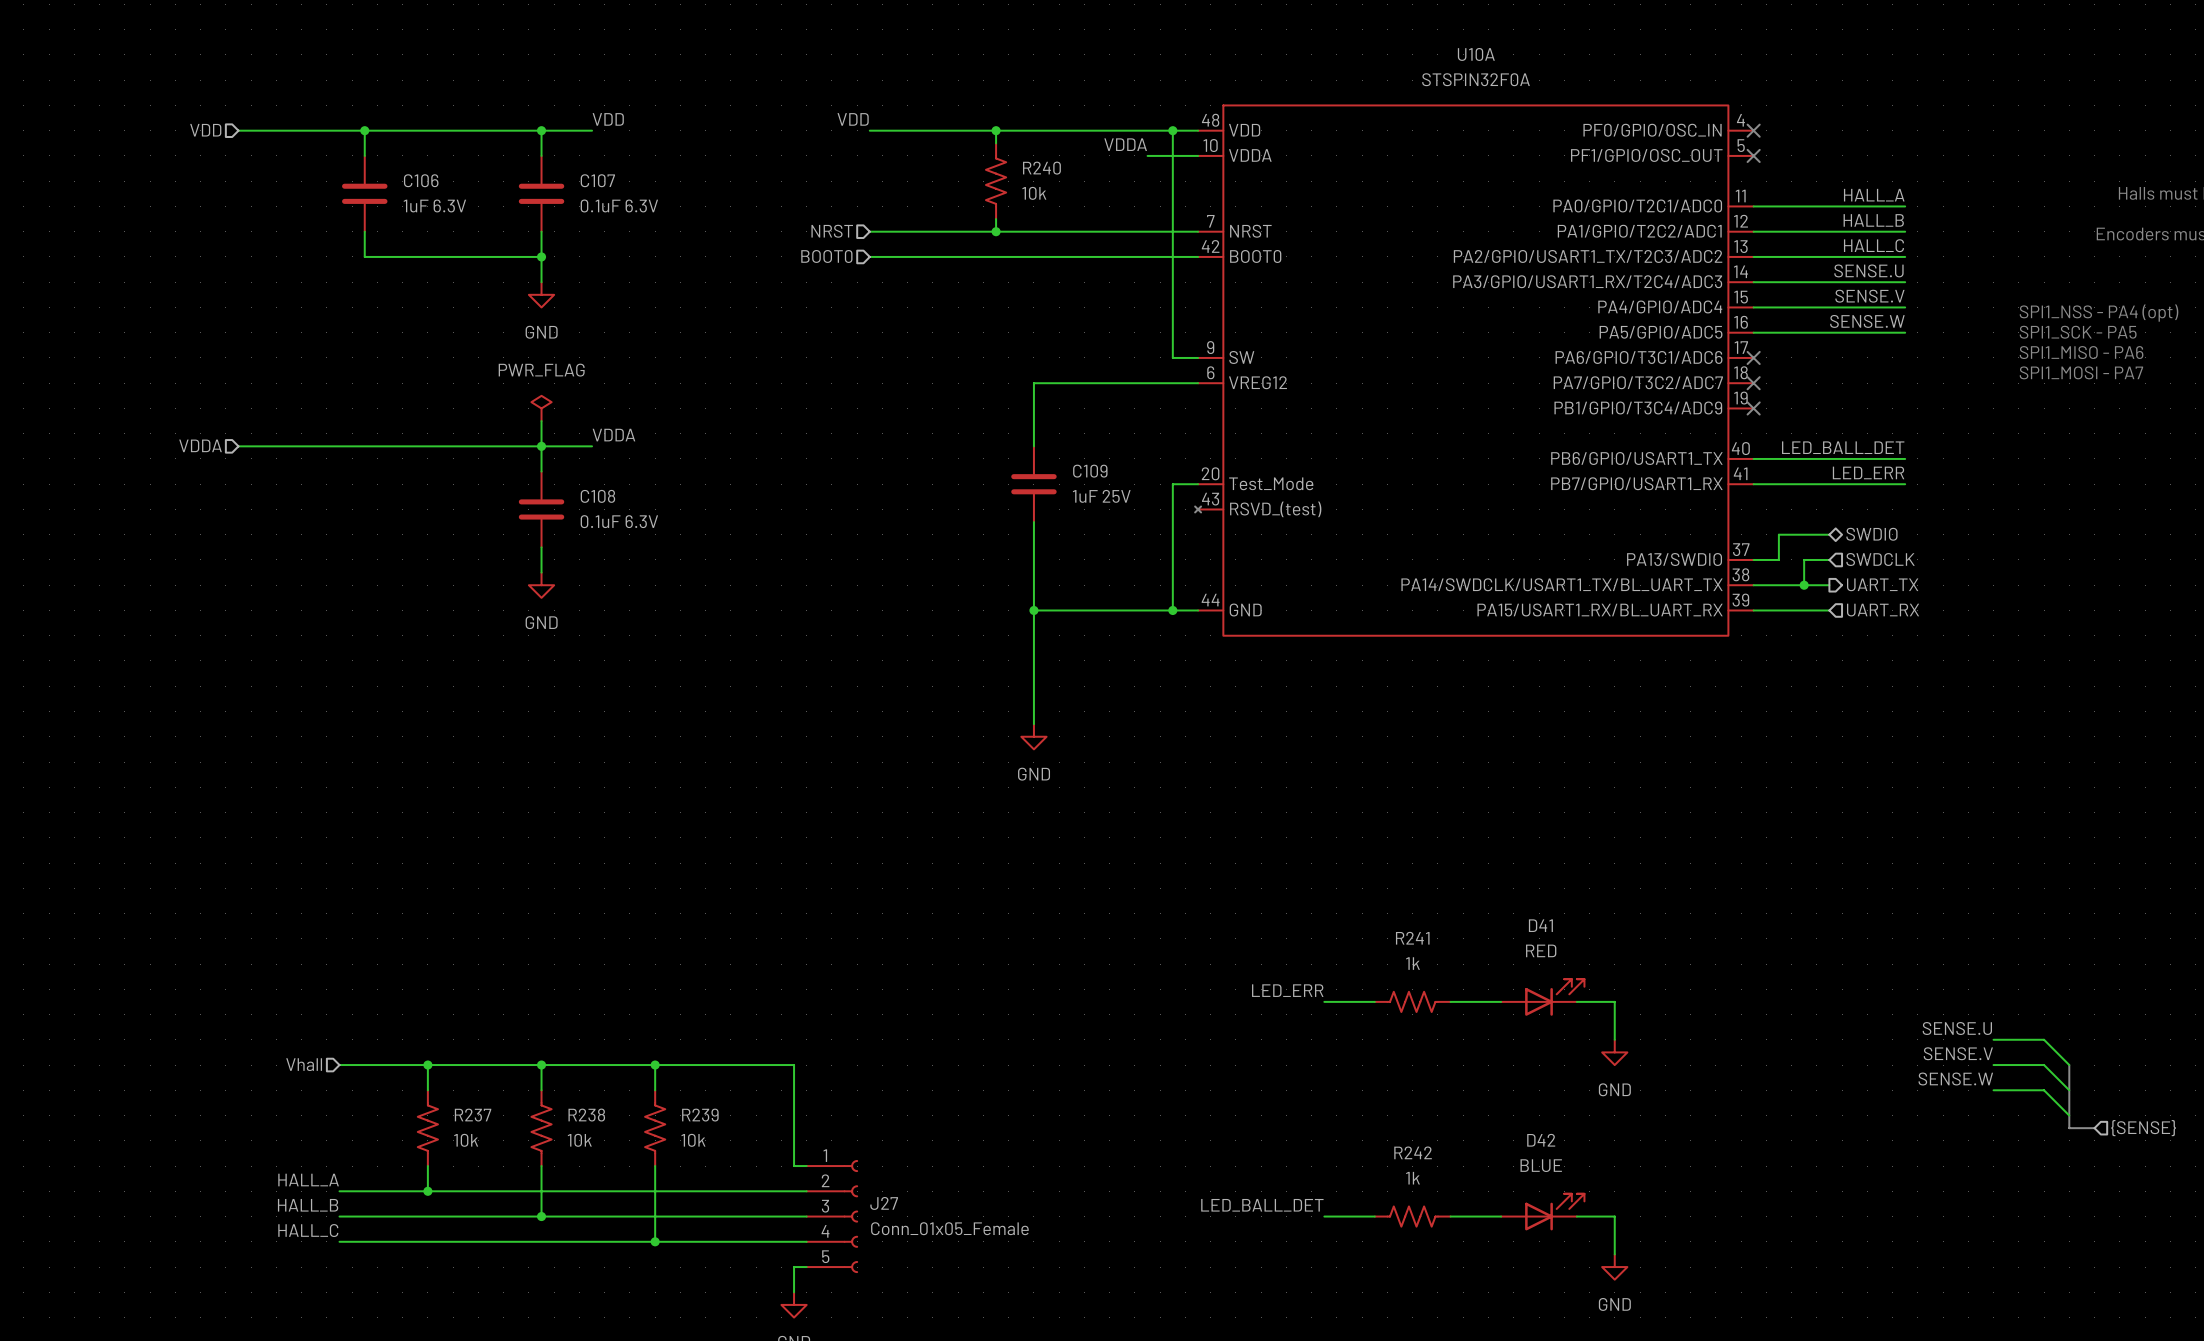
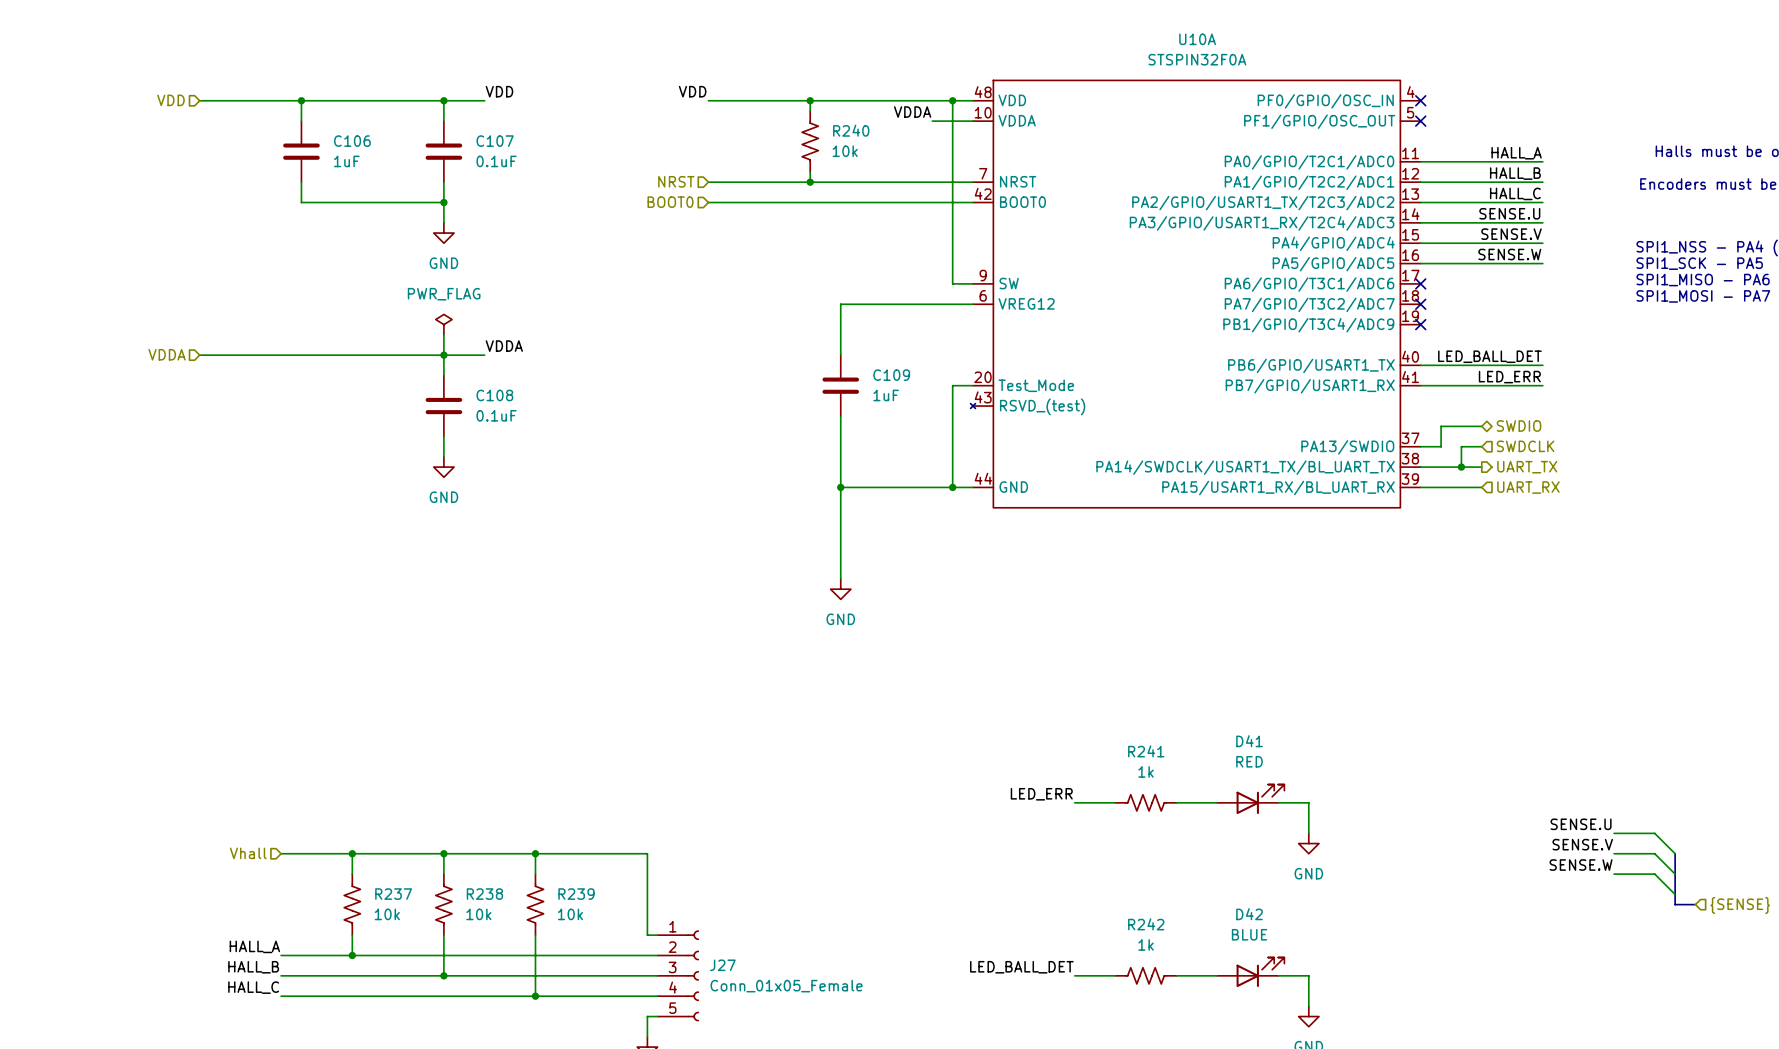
C106 value: 1uF 6.3V (434, 205) -> 1uF (346, 161)
C107 value: 0.1uF 6.3V (619, 205) -> 0.1uF (496, 161)
C109 value: 1uF 25V (1101, 496) -> 1uF (886, 395)
C108 value: 0.1uF 6.3V (619, 521) -> 0.1uF (496, 415)

